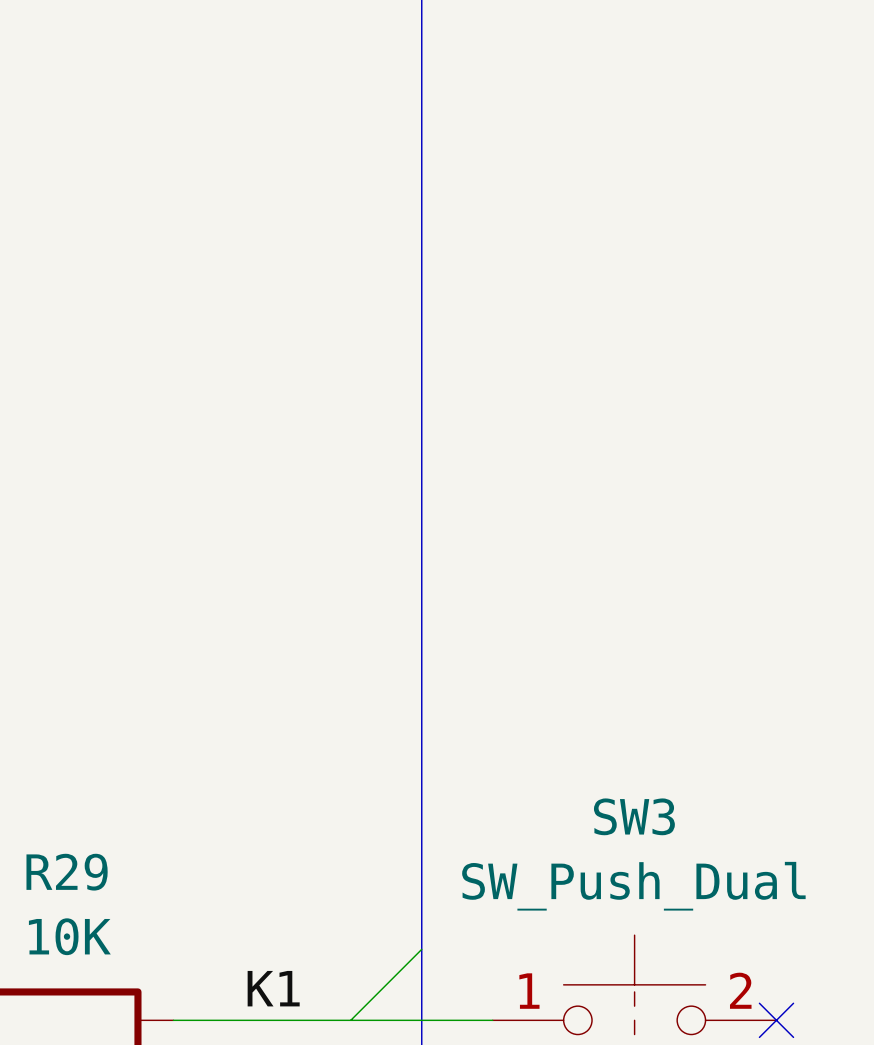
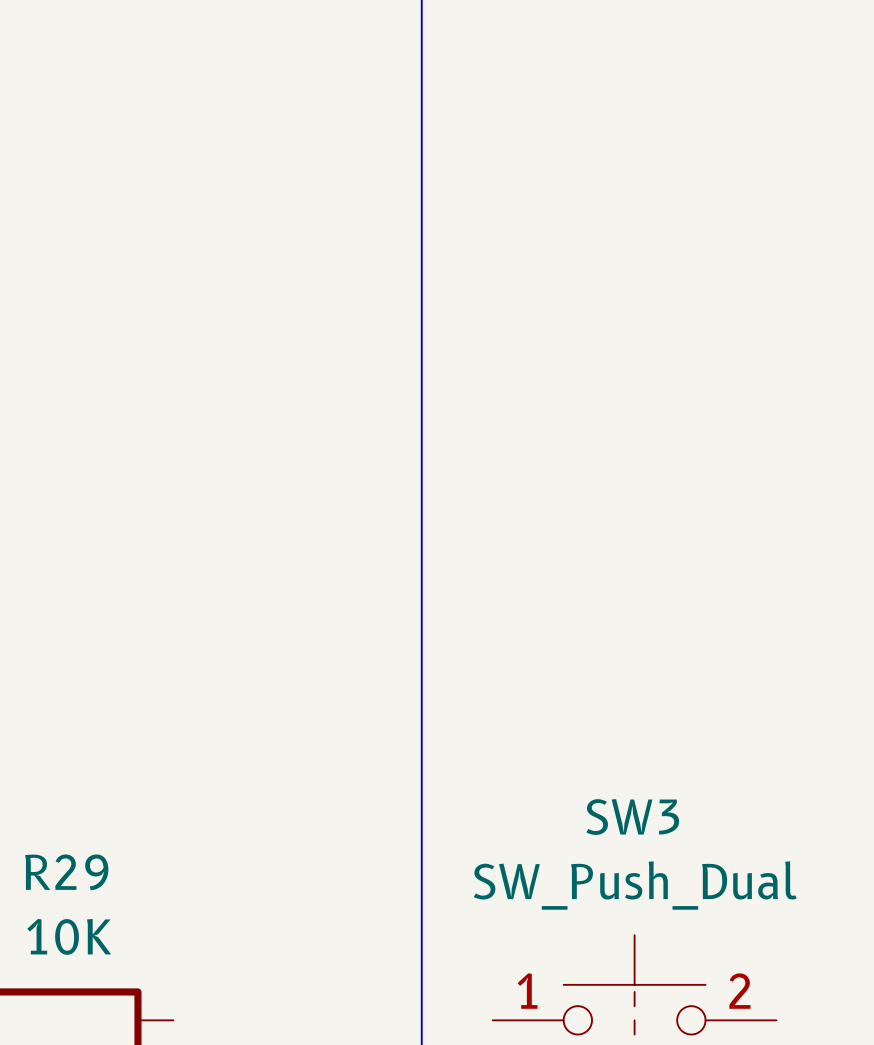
wire: (421, 949) (350, 1020) -> none
label: K1 (273, 988) -> none
wire: (173, 1020) (492, 1020) -> none
no-connect mark: (776, 1020) -> none

